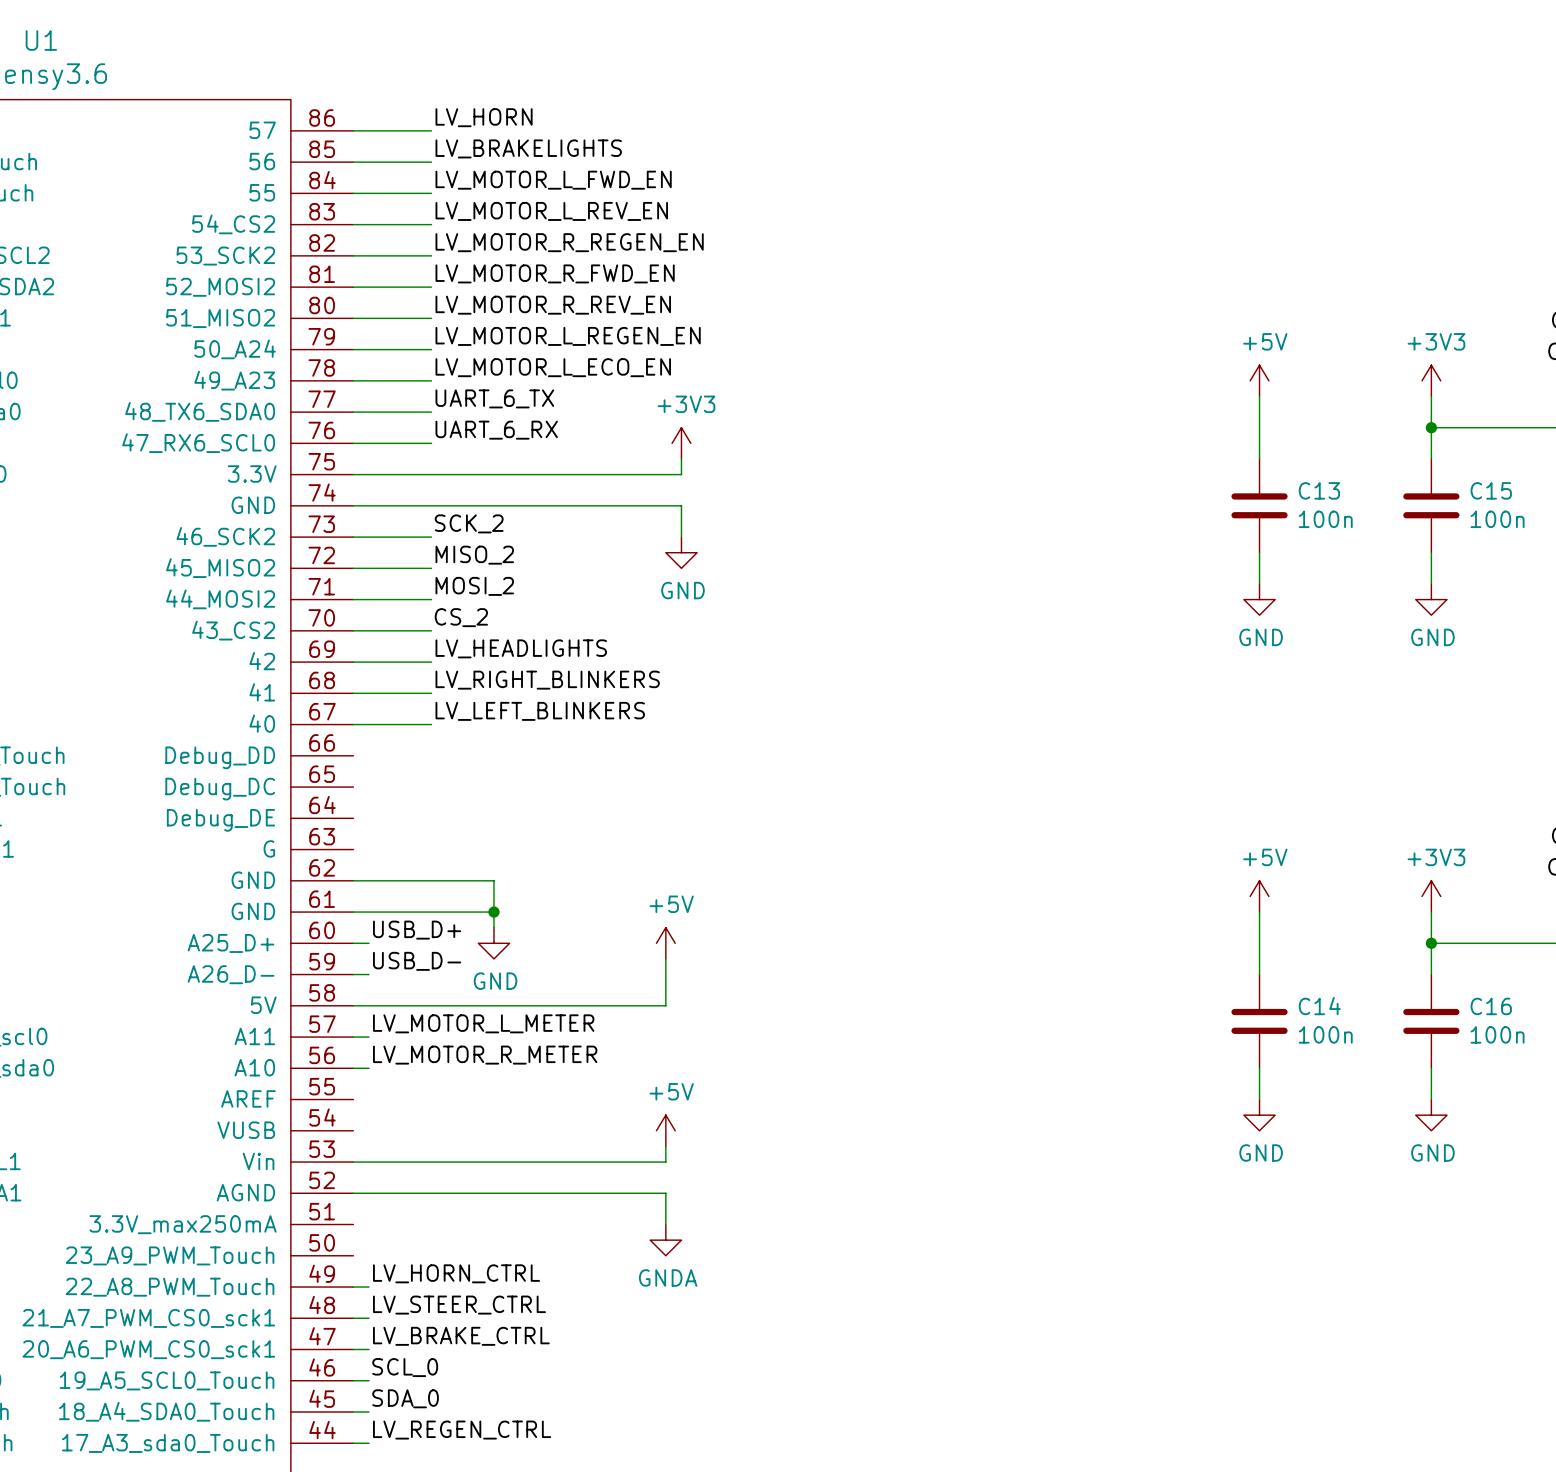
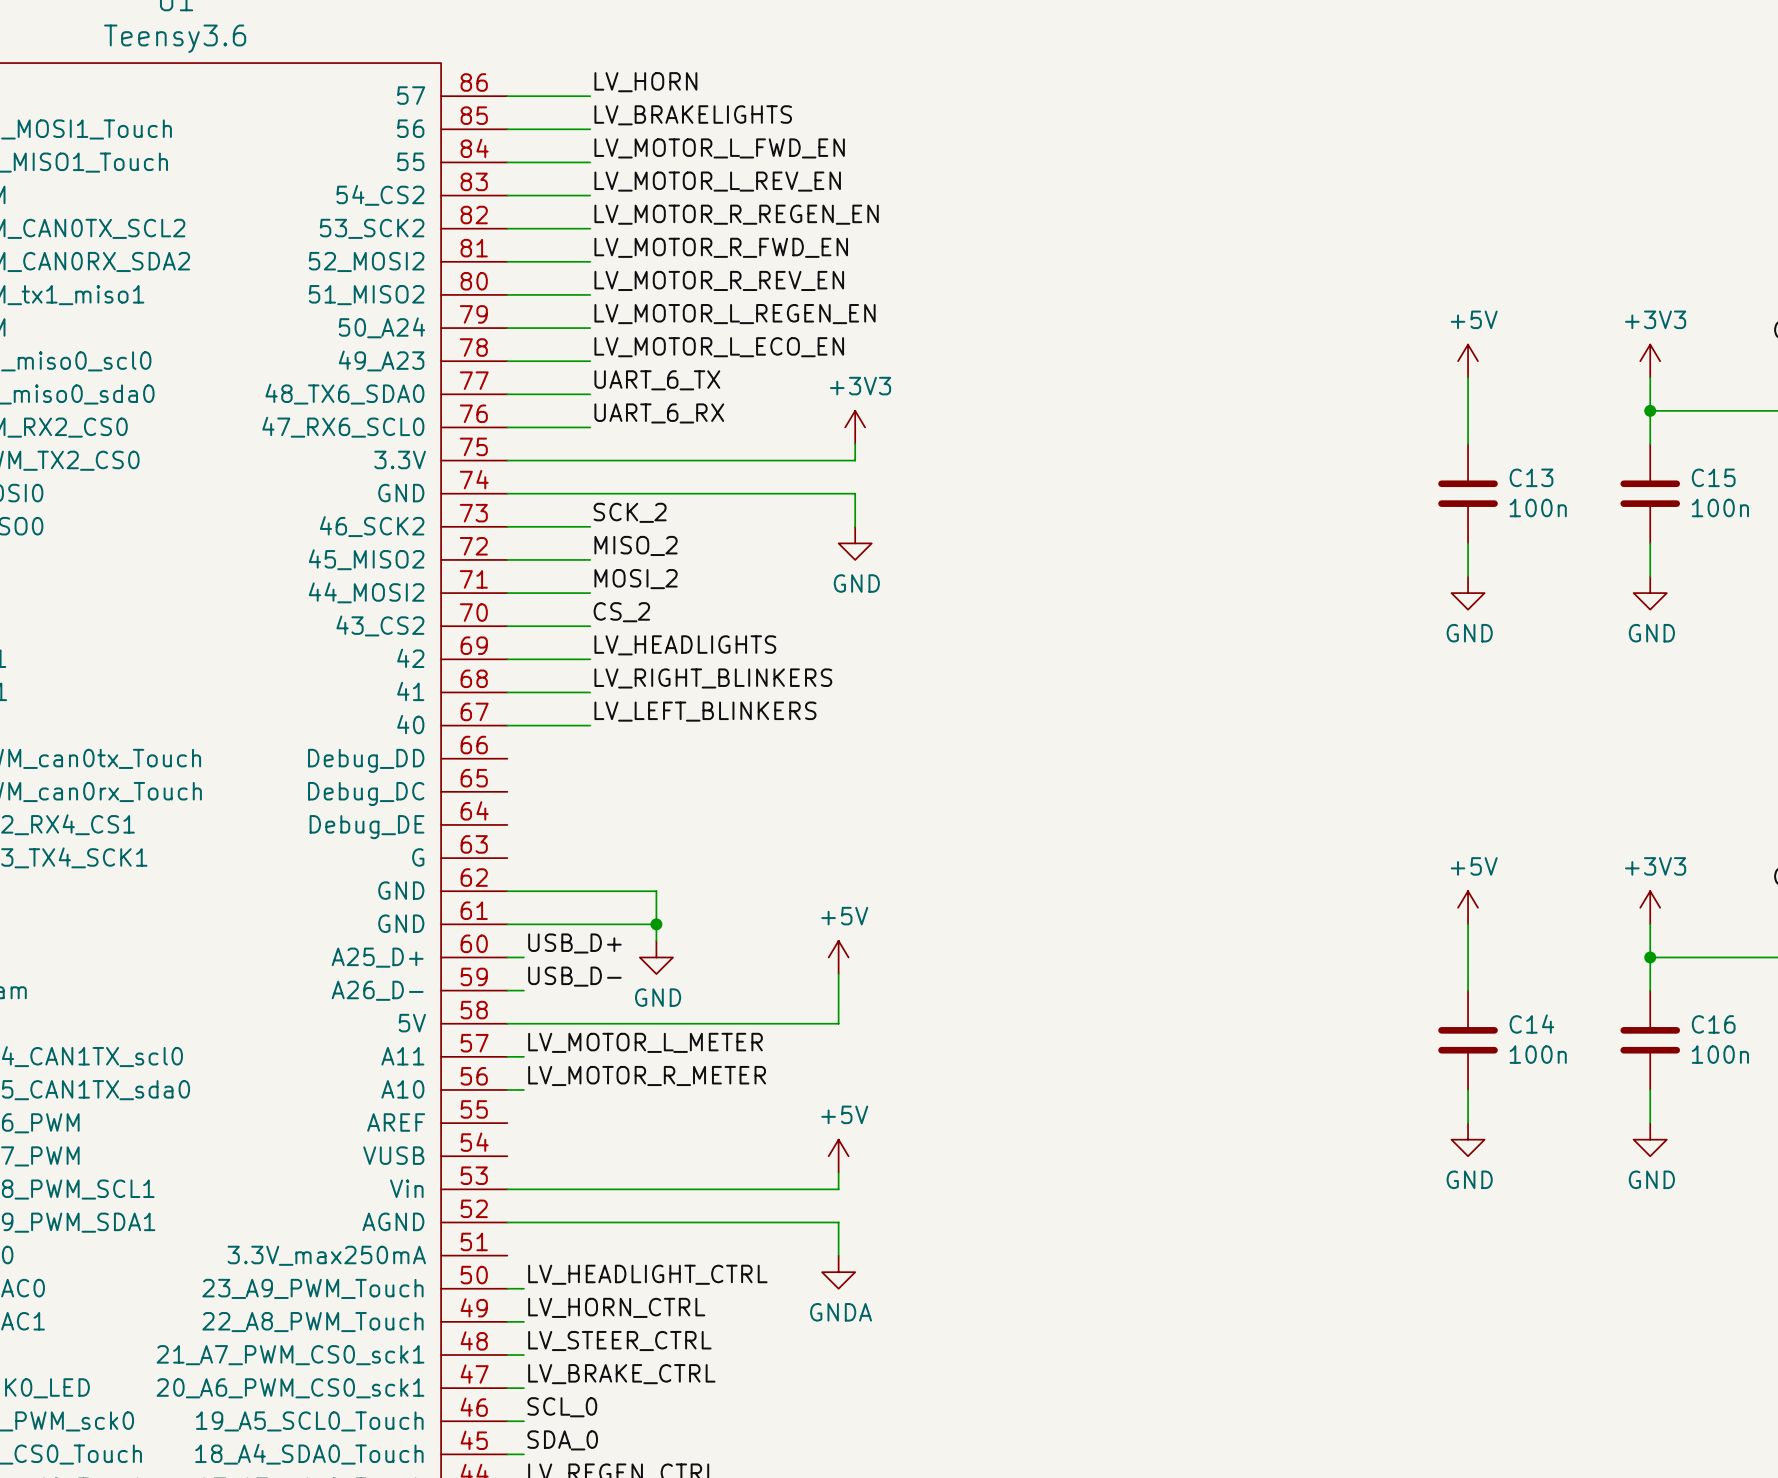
label: none -> LV_HEADLIGHT_CTRL (647, 1274)
wire: none -> (507, 1288) (523, 1288)

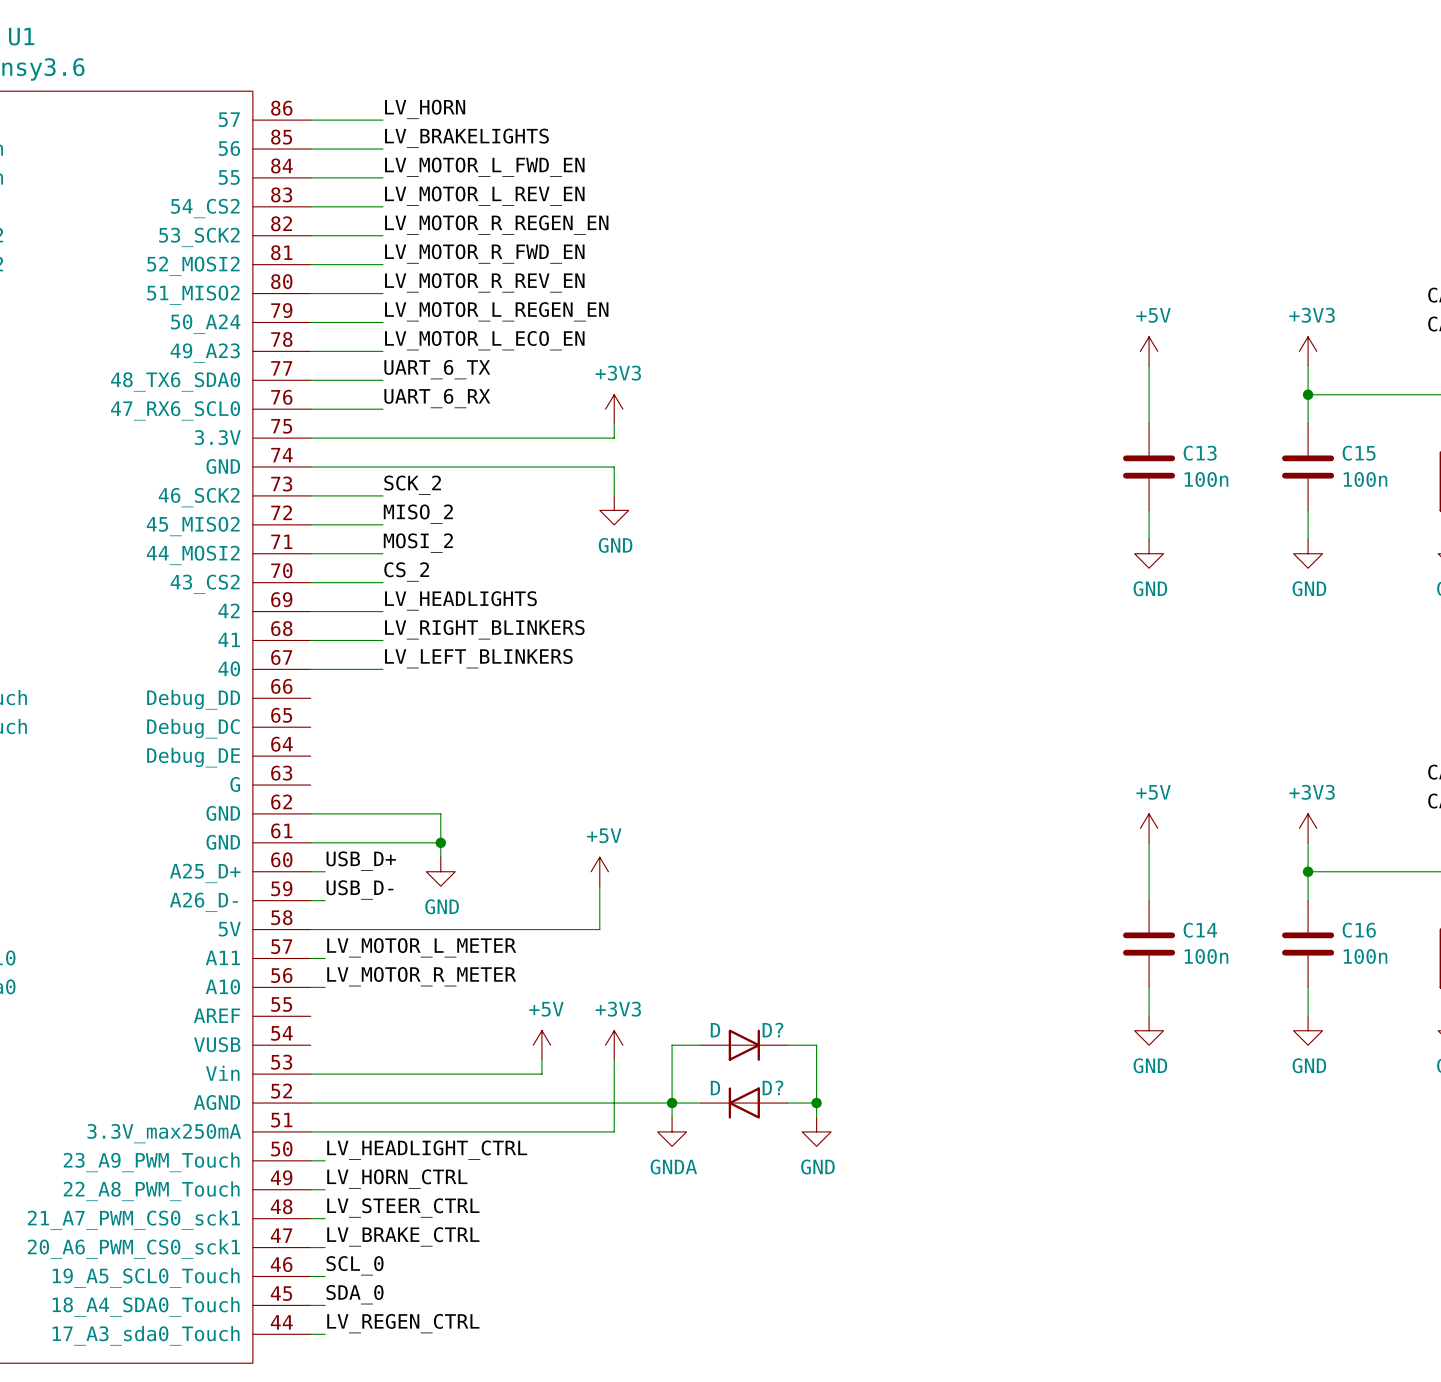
power symbol position: +5V (838, 1156) -> +5V (541, 1045)
power symbol: none -> +3V3 (614, 1045)
wire: none -> (700, 1045) (672, 1045) (672, 1117)
D?: none -> D (744, 1045)
wire: none -> (787, 1045) (816, 1045) (816, 1117)
wire: (838, 1172) (838, 1189) (772, 1189) -> (541, 1059) (541, 1074)
wire: none -> (614, 1059) (614, 1131) (310, 1131)
wire: (838, 1222) (838, 1255) -> (599, 1103) (700, 1103)
junction: none -> (672, 1103)
D?: none -> D (744, 1103)
wire: none -> (787, 1103) (816, 1103)
junction: none -> (816, 1103)
power symbol: none -> GND (816, 1131)
power symbol position: GNDA (838, 1272) -> GNDA (672, 1131)

